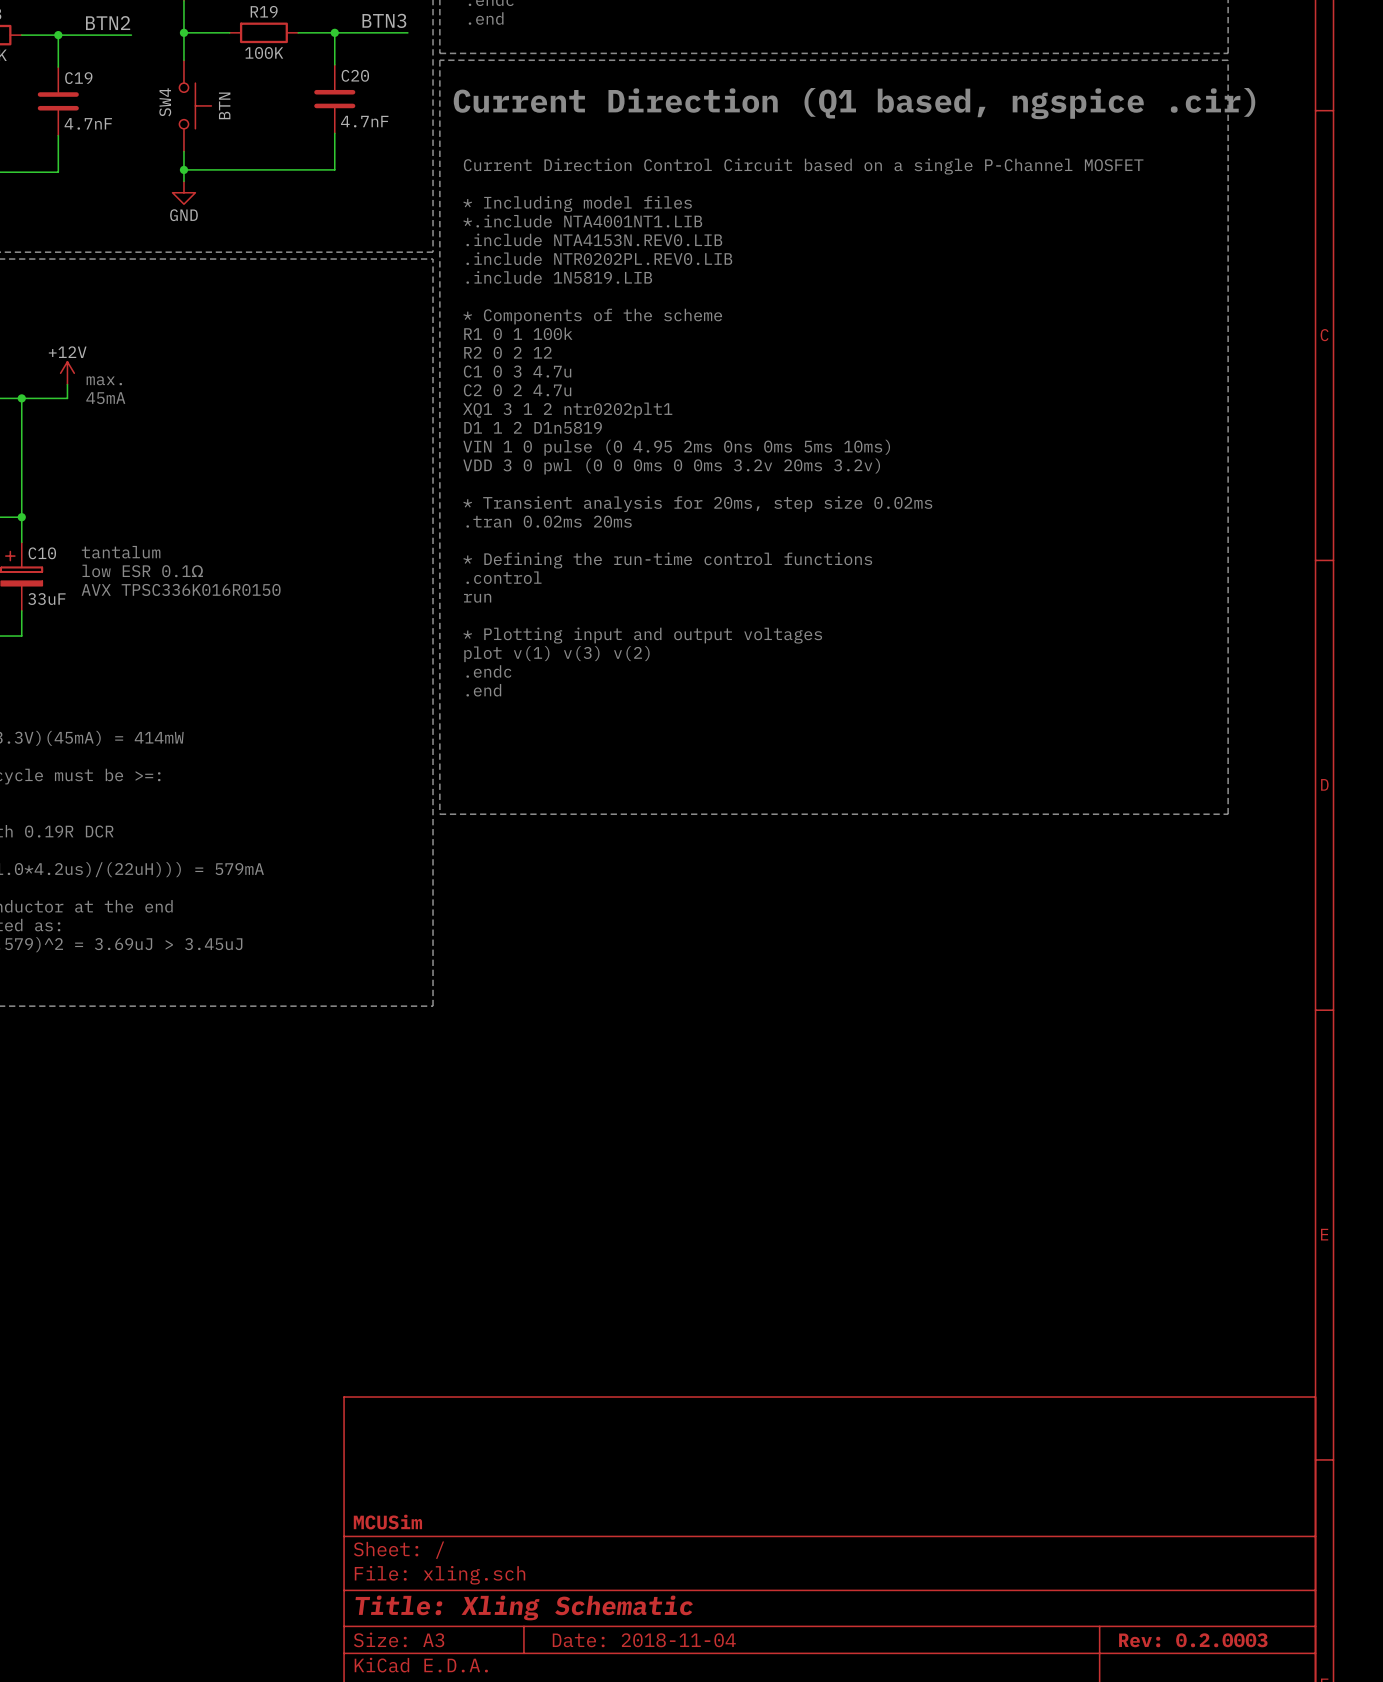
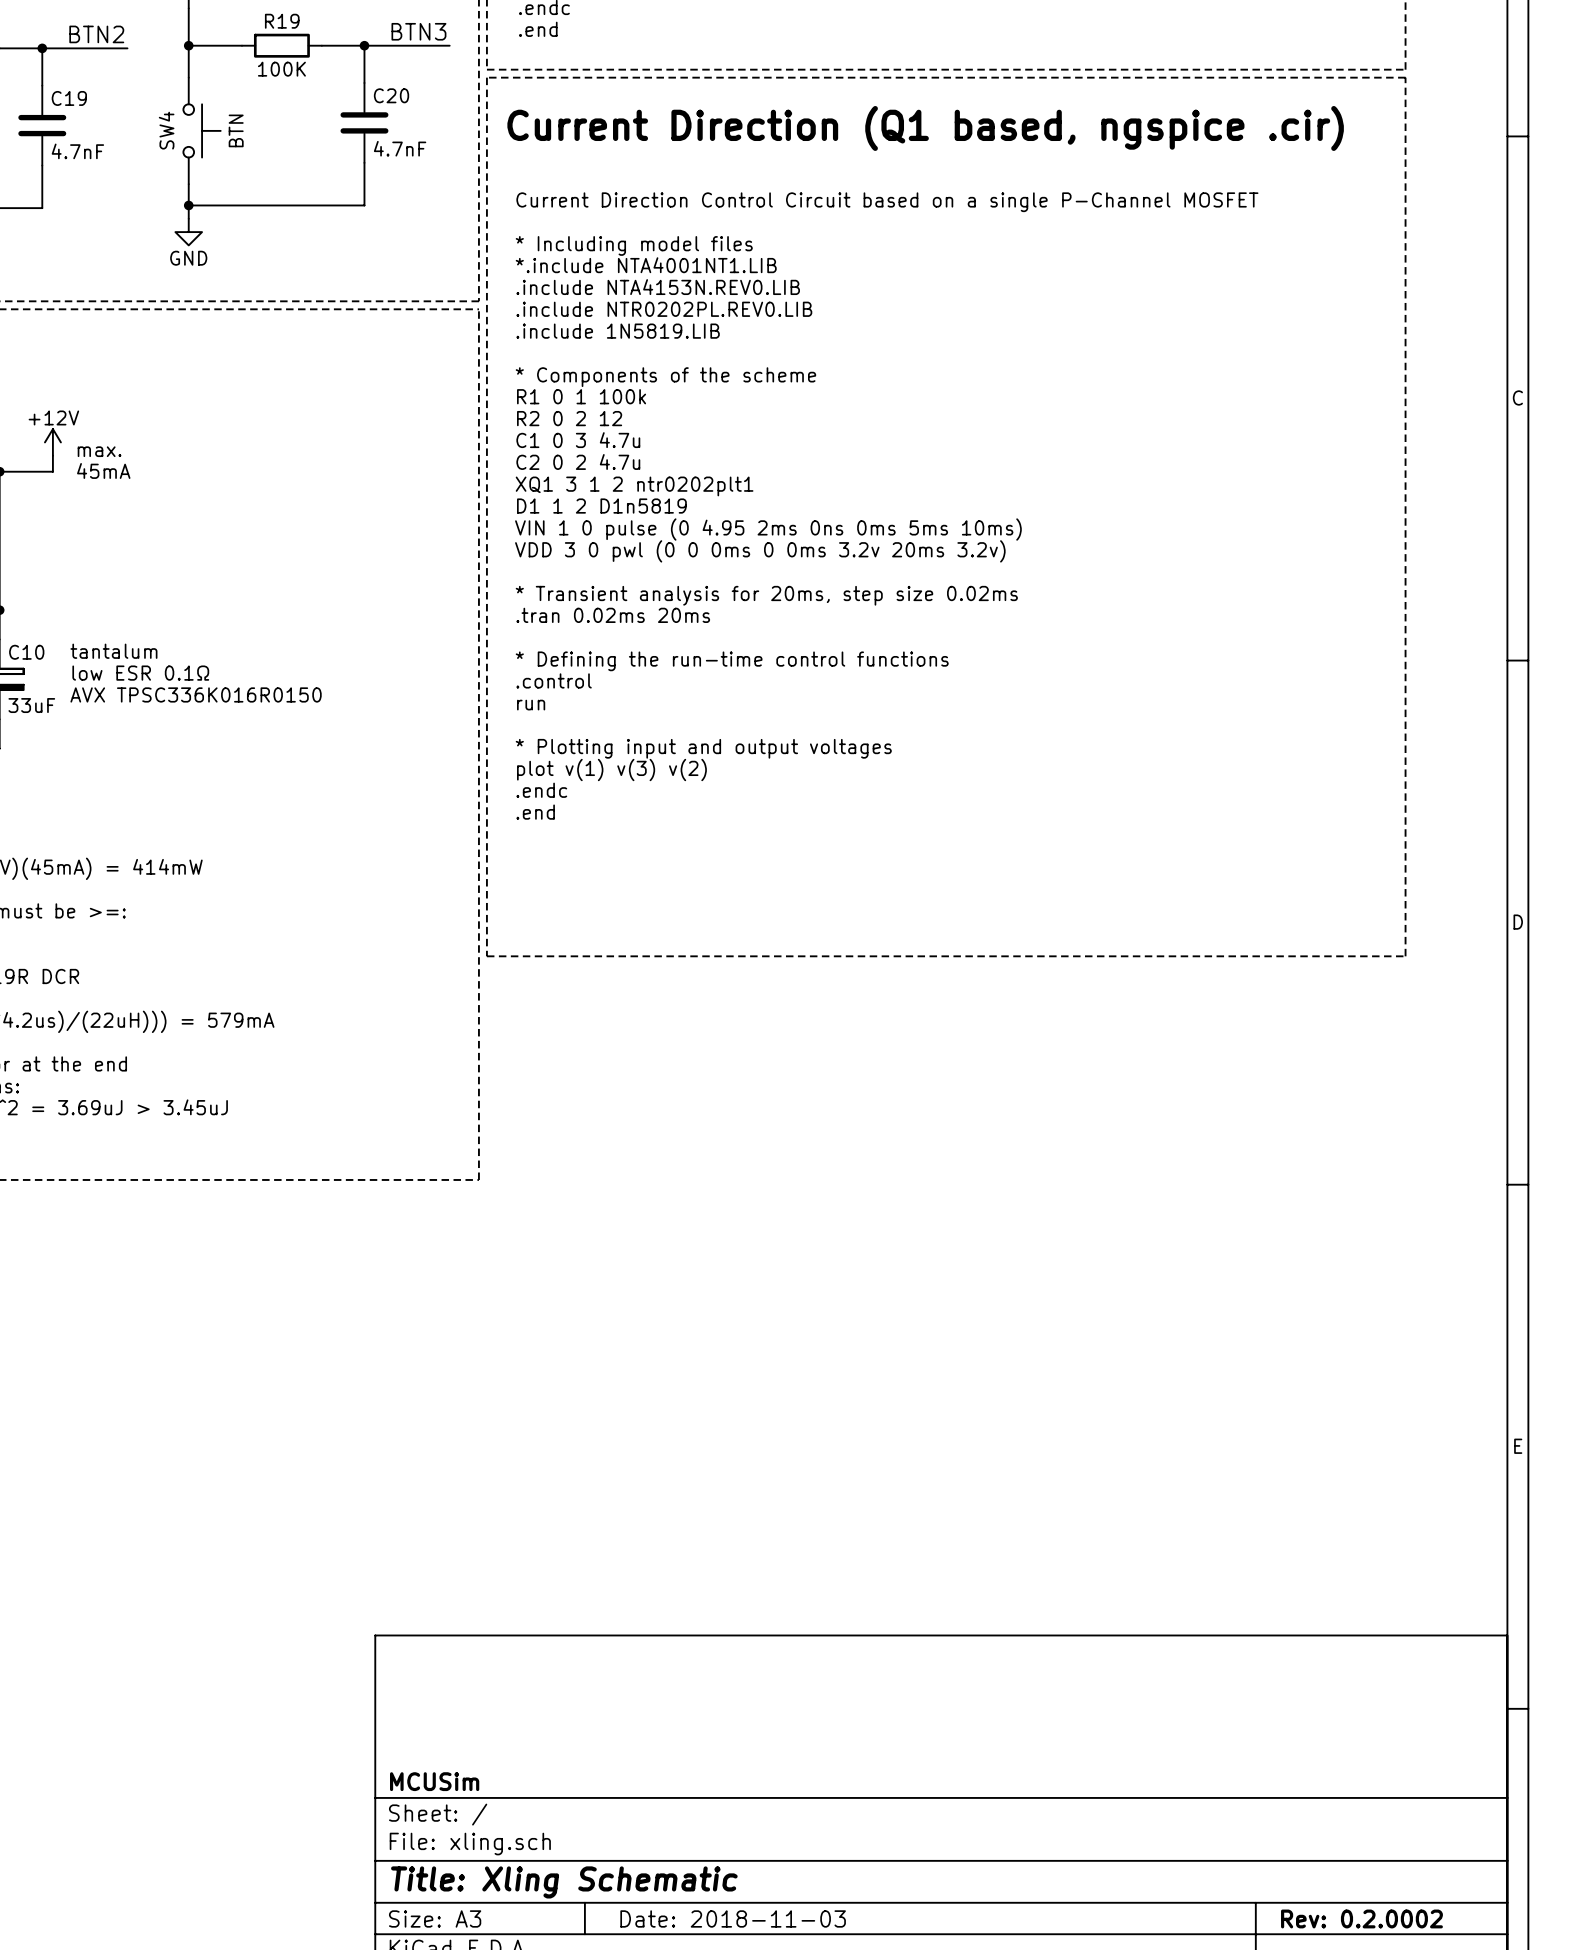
title block: Date: 2018-11-04 (644, 1640) -> Date: 2018-11-03 (733, 1918)
title block: Rev: 0.2.0003 (1193, 1640) -> Rev: 0.2.0002 (1361, 1918)

